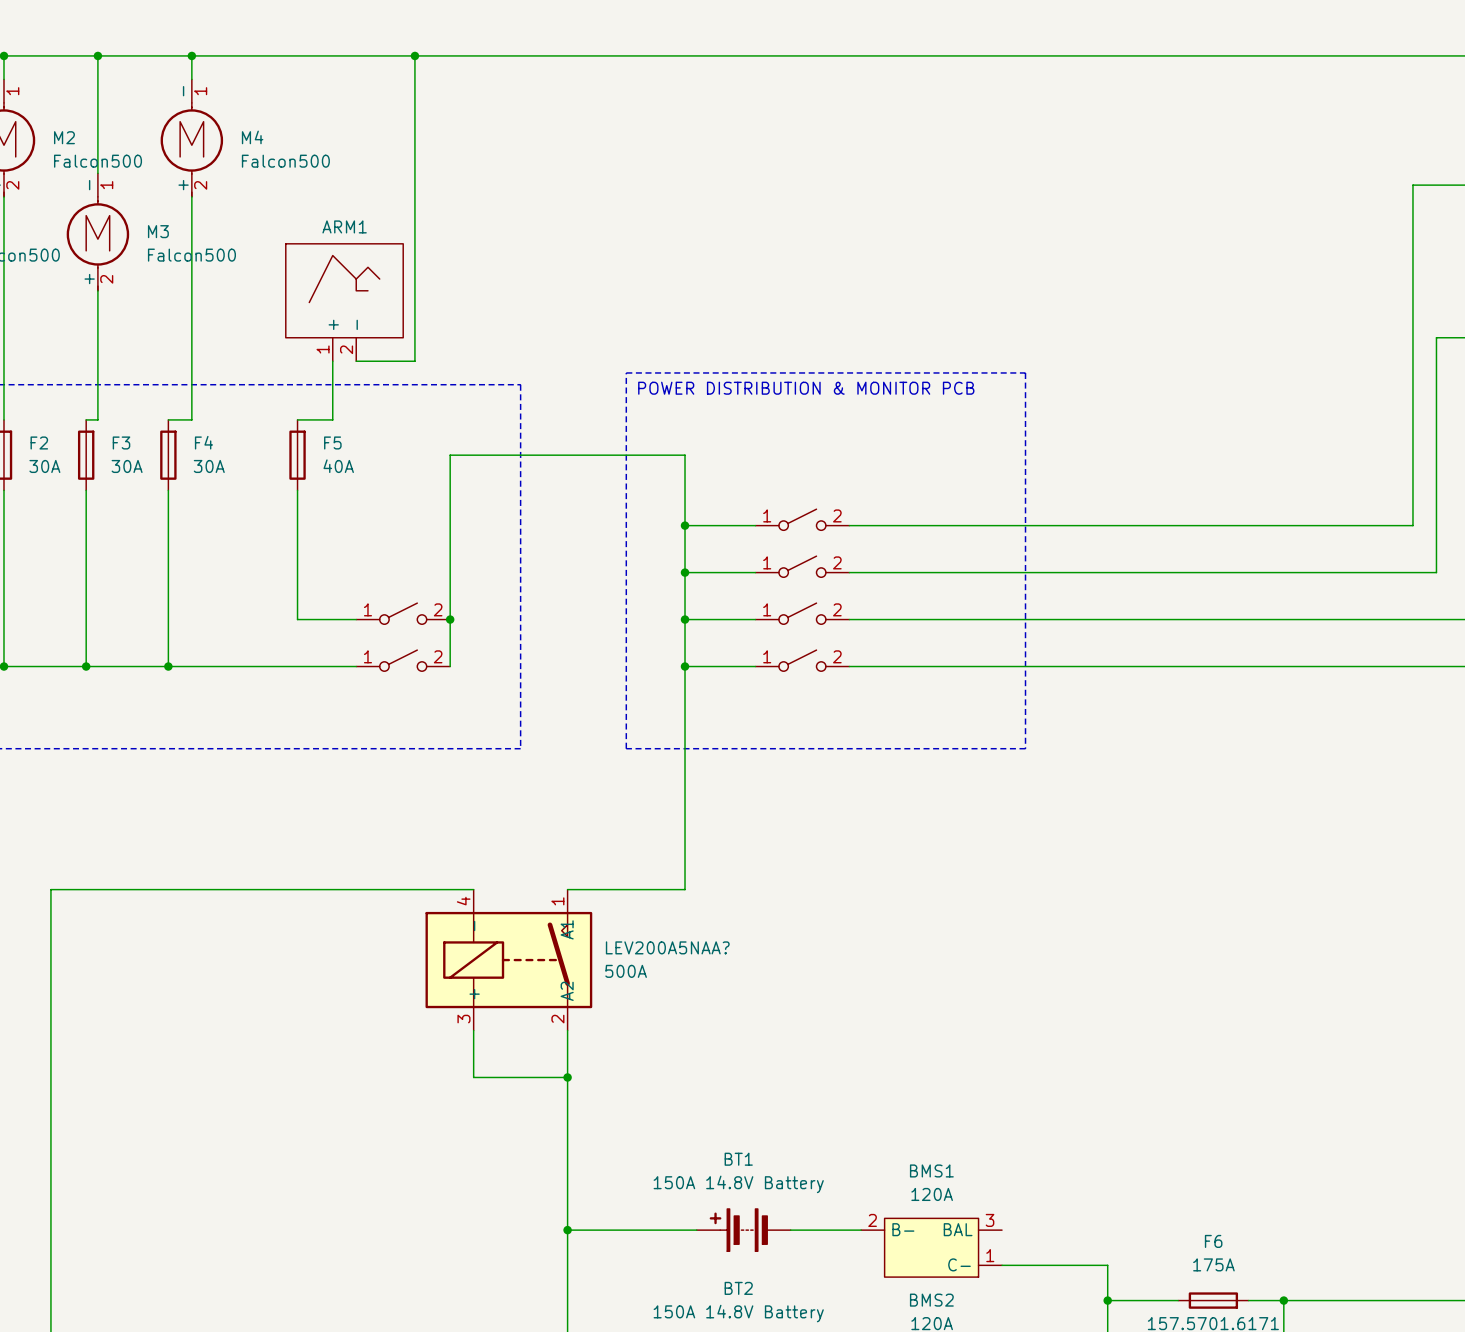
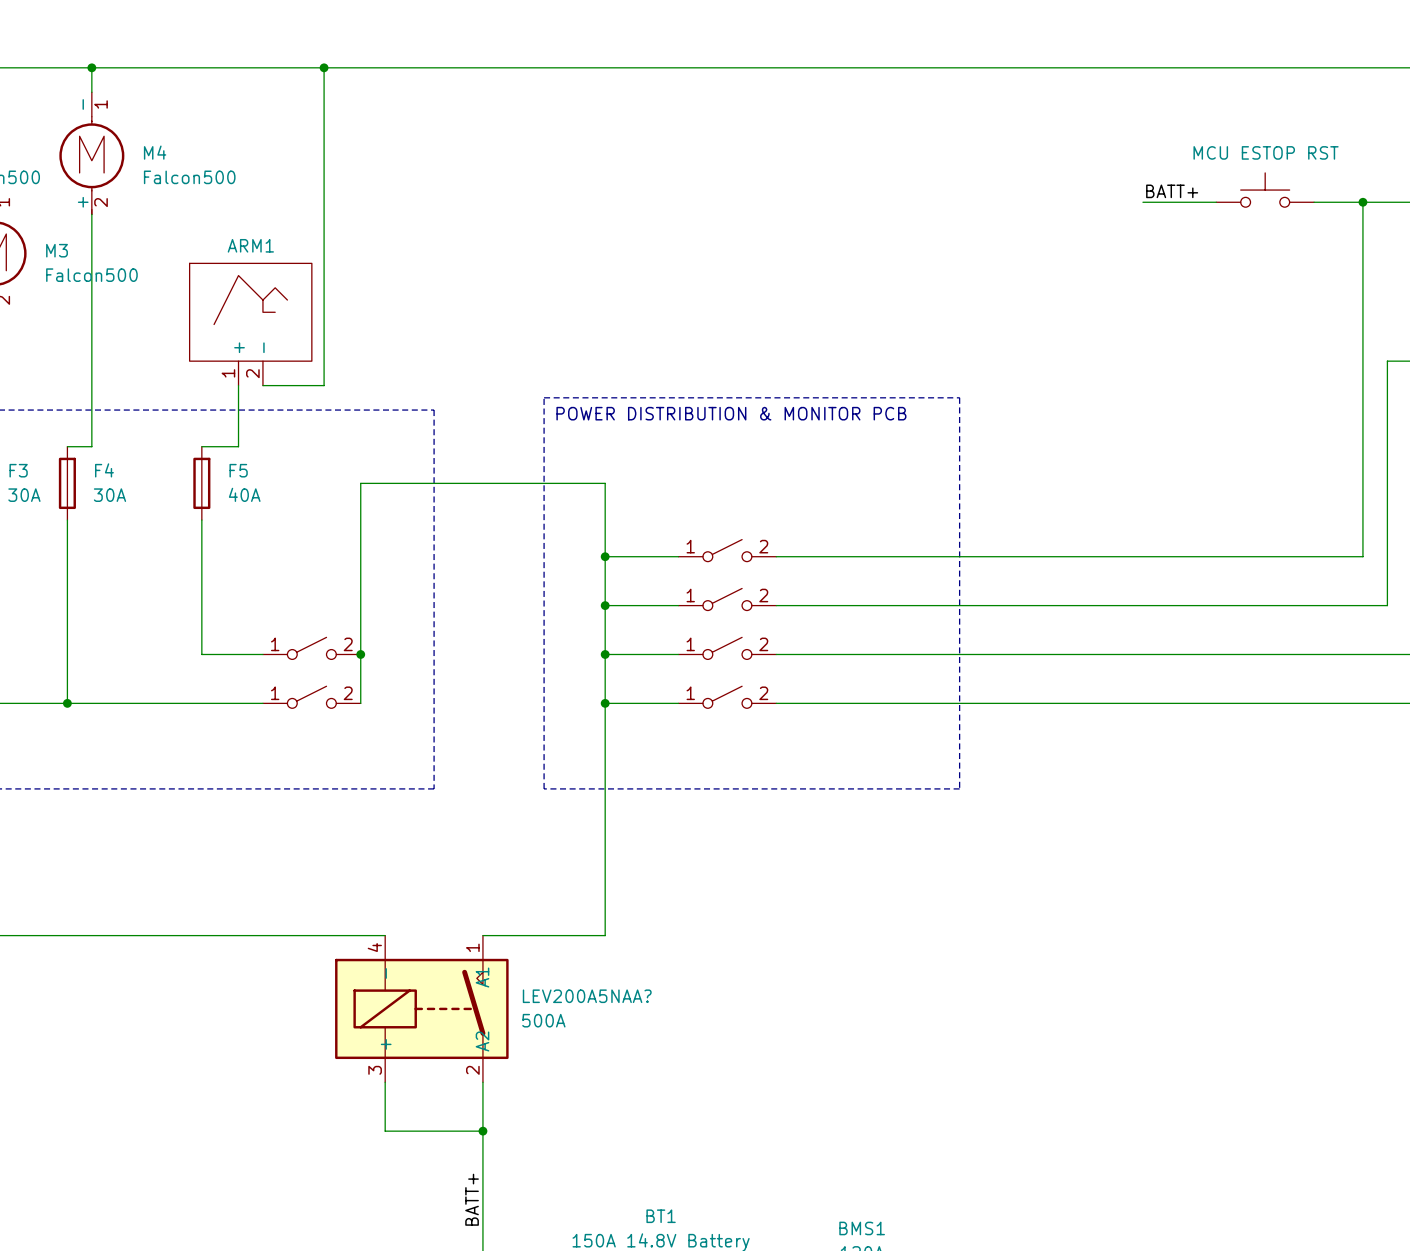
part: none -> MCU ESTOP RST (1265, 190)
label: none -> BATT+ (1172, 191)
wire: none -> (1142, 202) (1216, 202)
wire: none -> (1314, 202) (1362, 202)
junction: none -> (1362, 202)
label: none -> BATT+ (472, 1199)

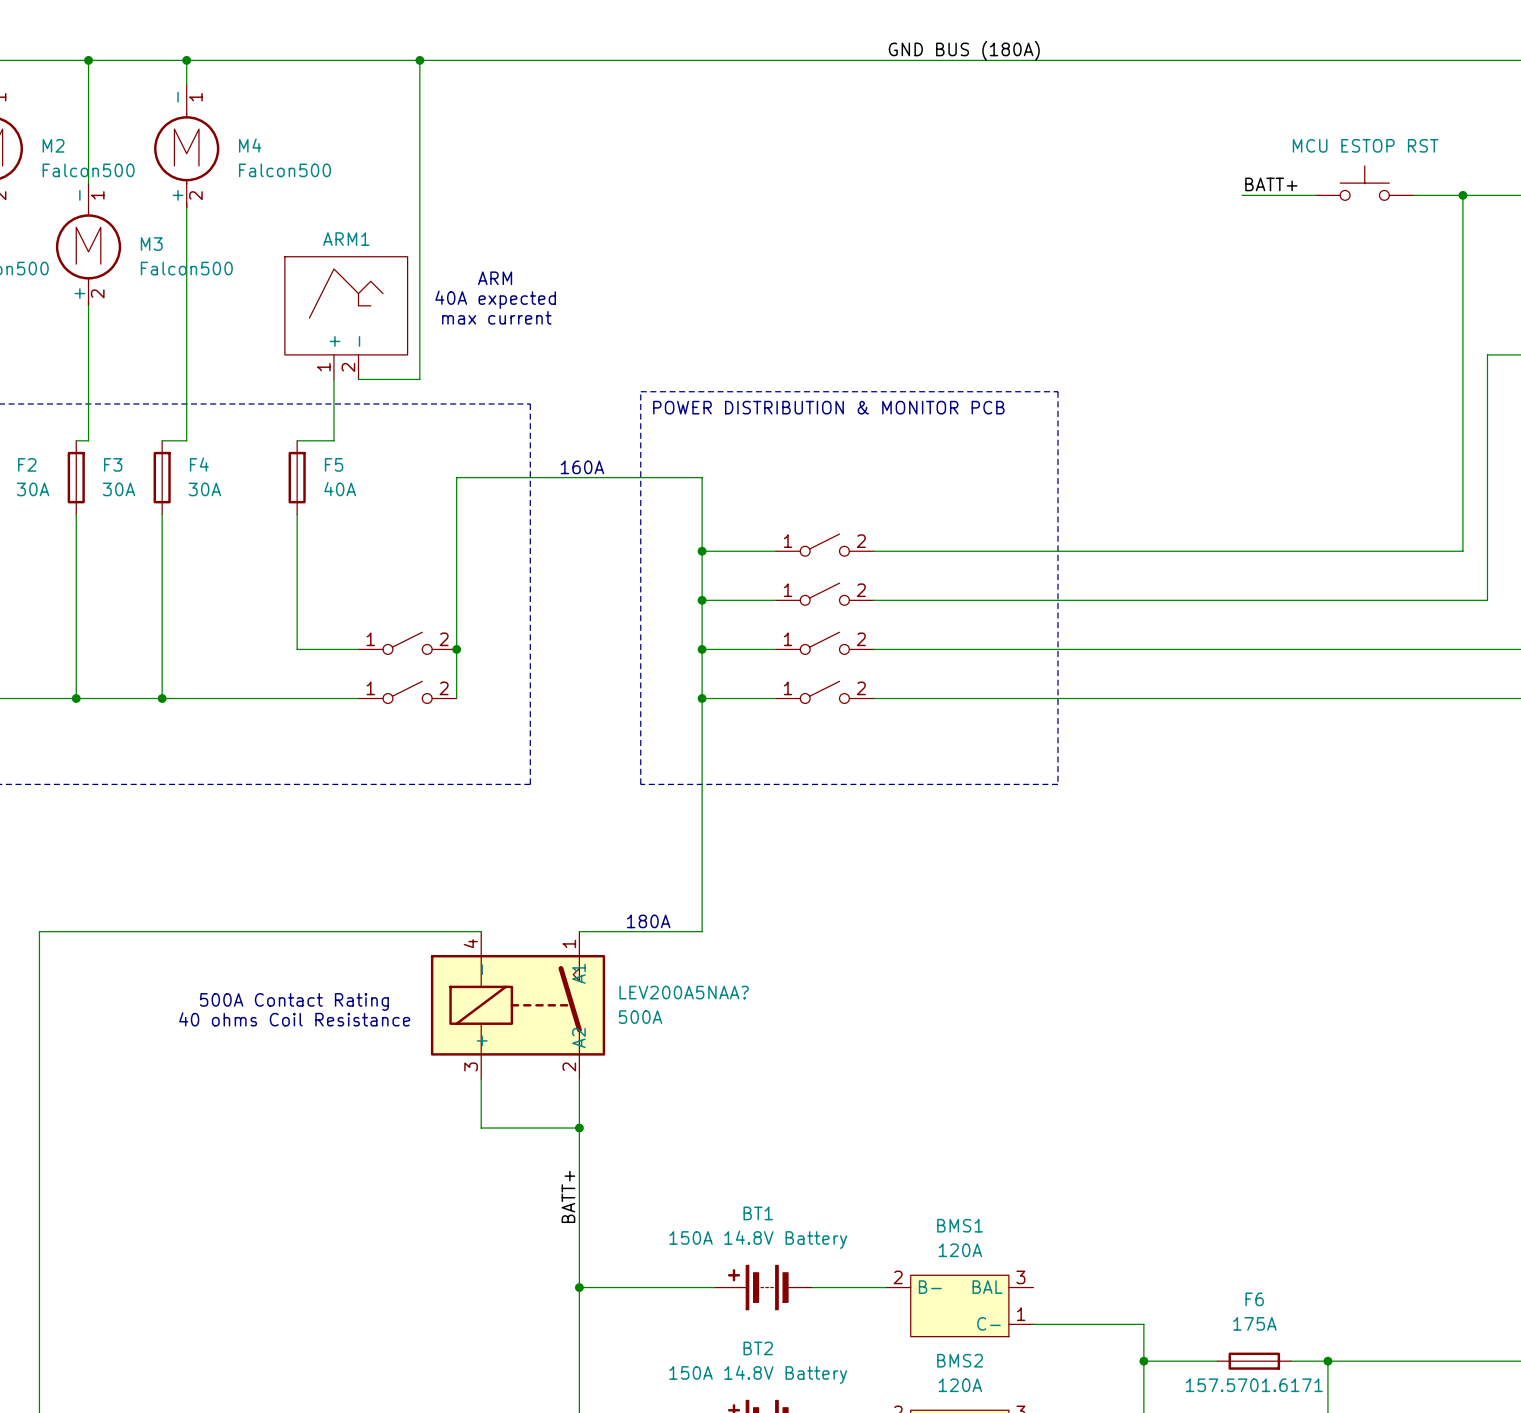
label: none -> GND BUS (180A) (964, 50)
text: none -> ARM (495, 278)
text: none -> 40A expected (495, 299)
text: none -> max current (496, 317)
text: none -> 160A (582, 467)
text: none -> 180A (648, 921)
text: none -> 500A Contact Rating (294, 1001)
text: none -> 40 ohms Coil Resistance (294, 1019)

